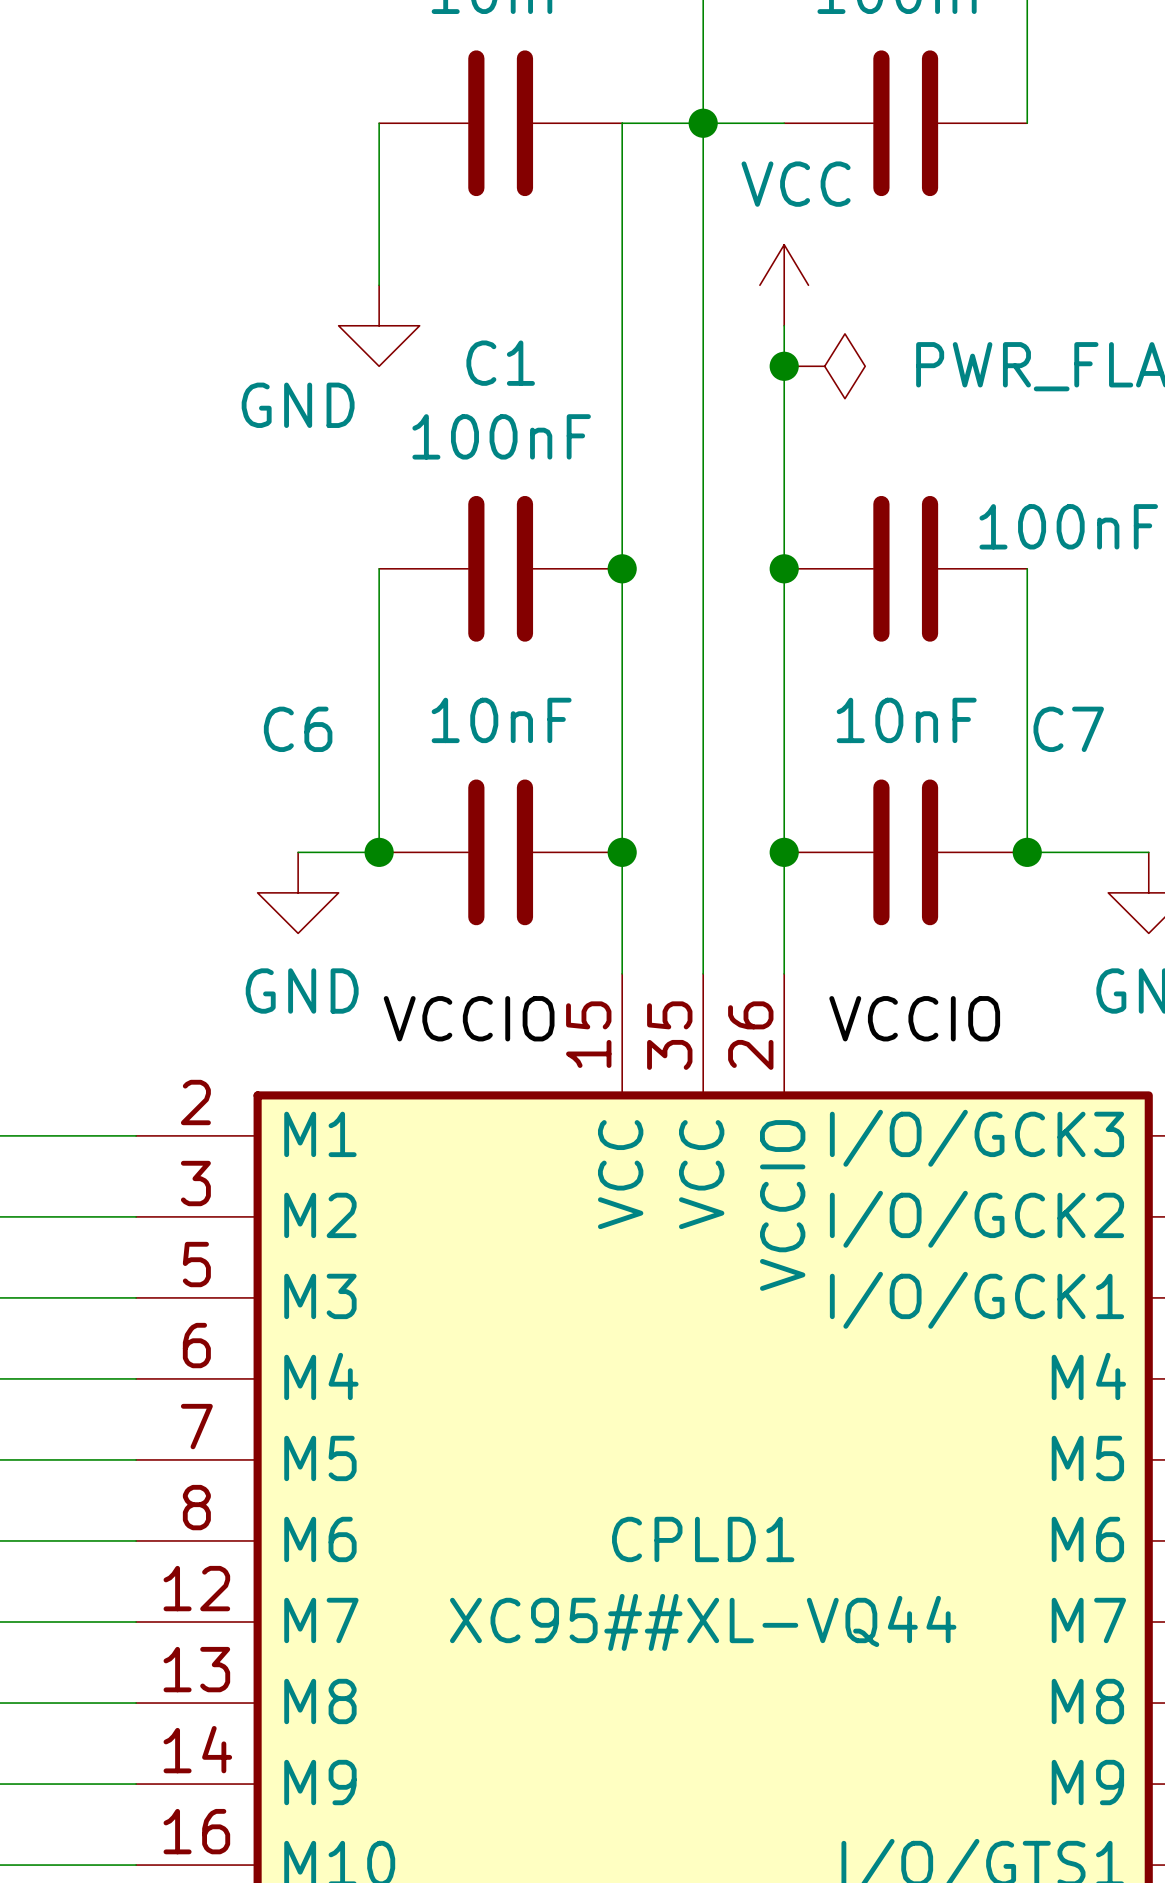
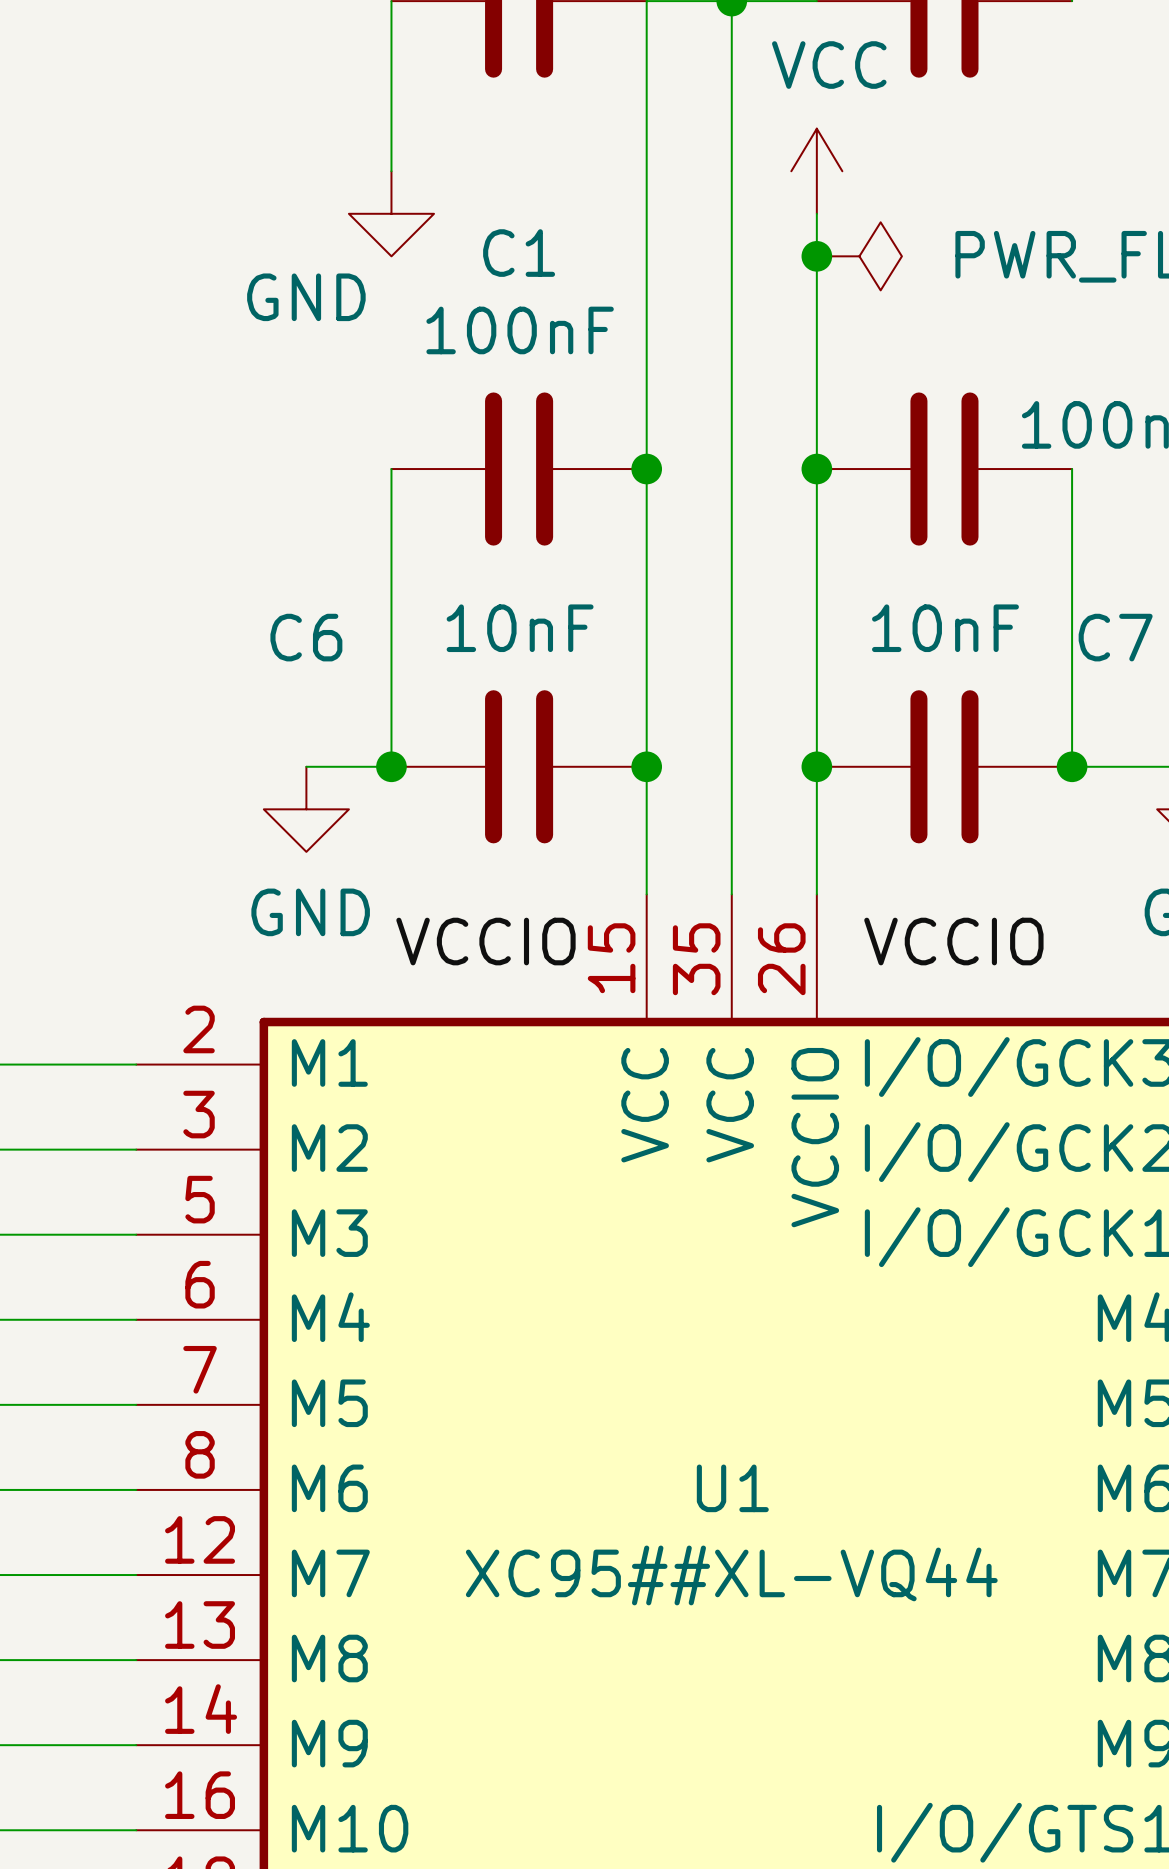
CPLD1 name: CPLD1 (703, 1539) -> U1 (732, 1488)

